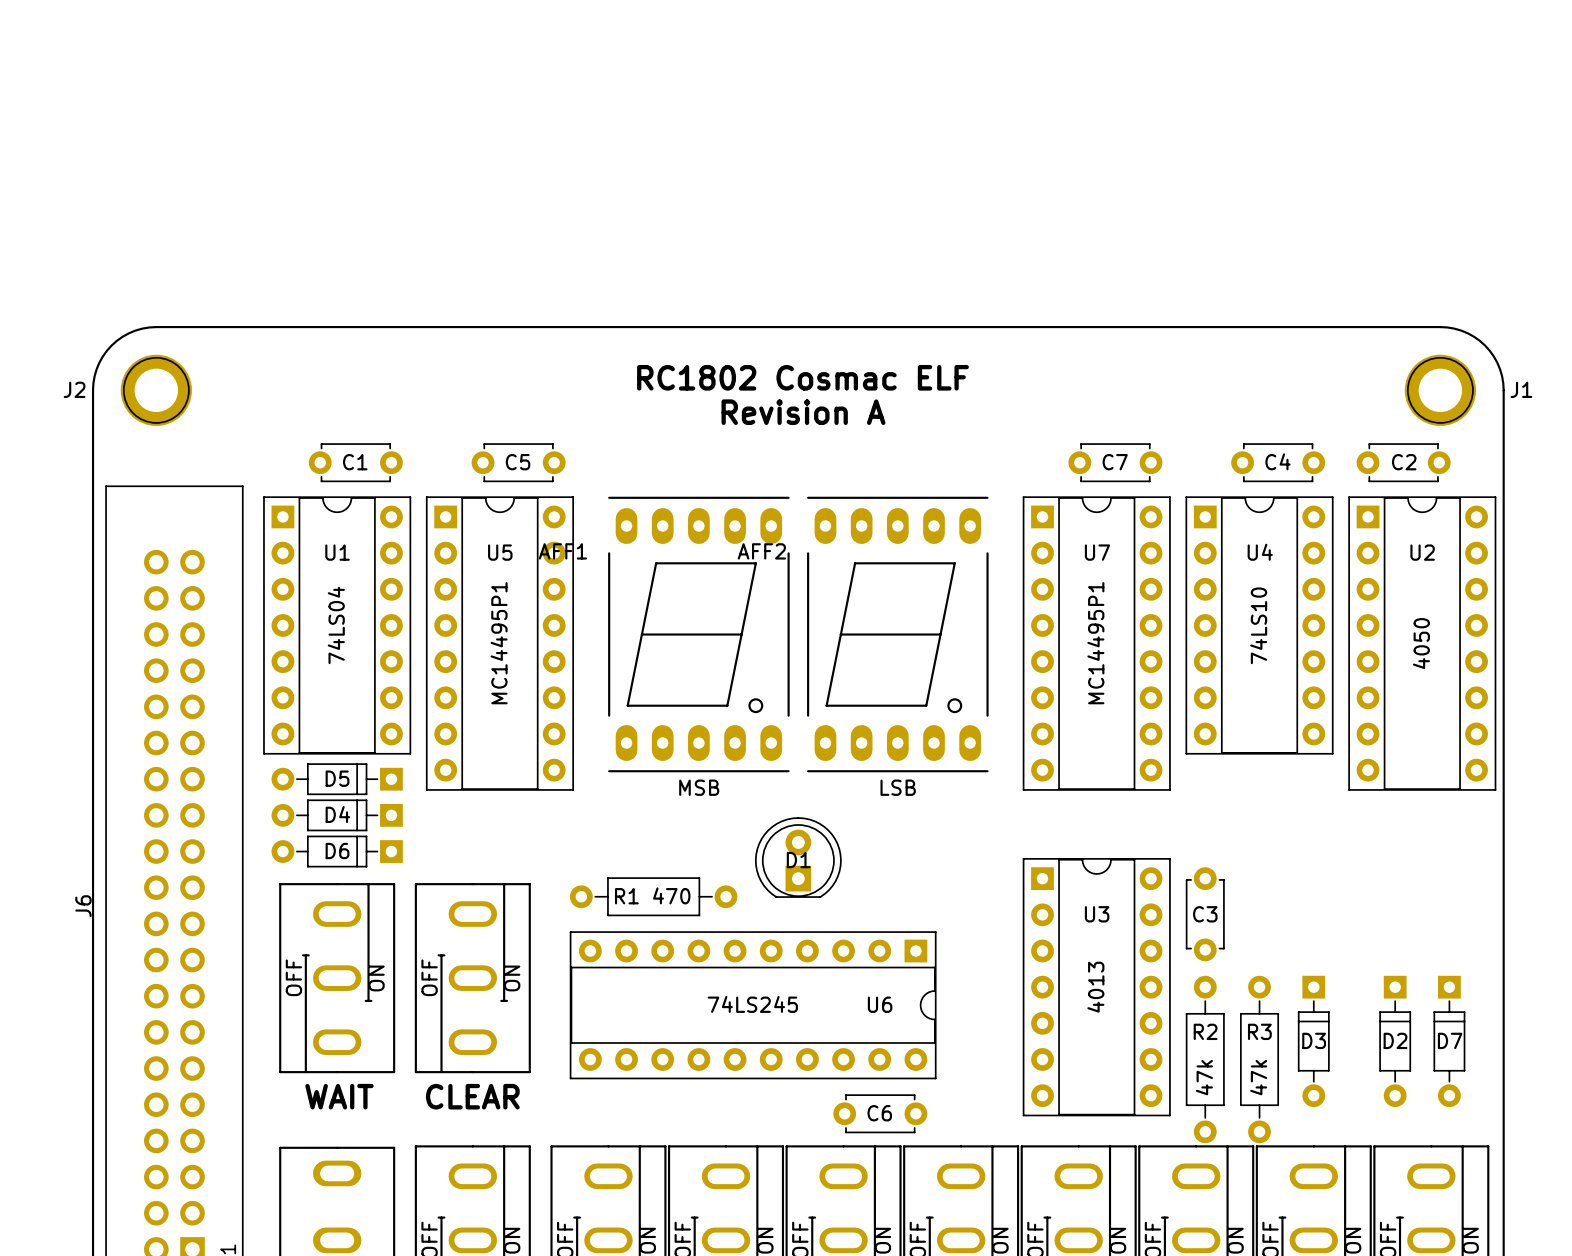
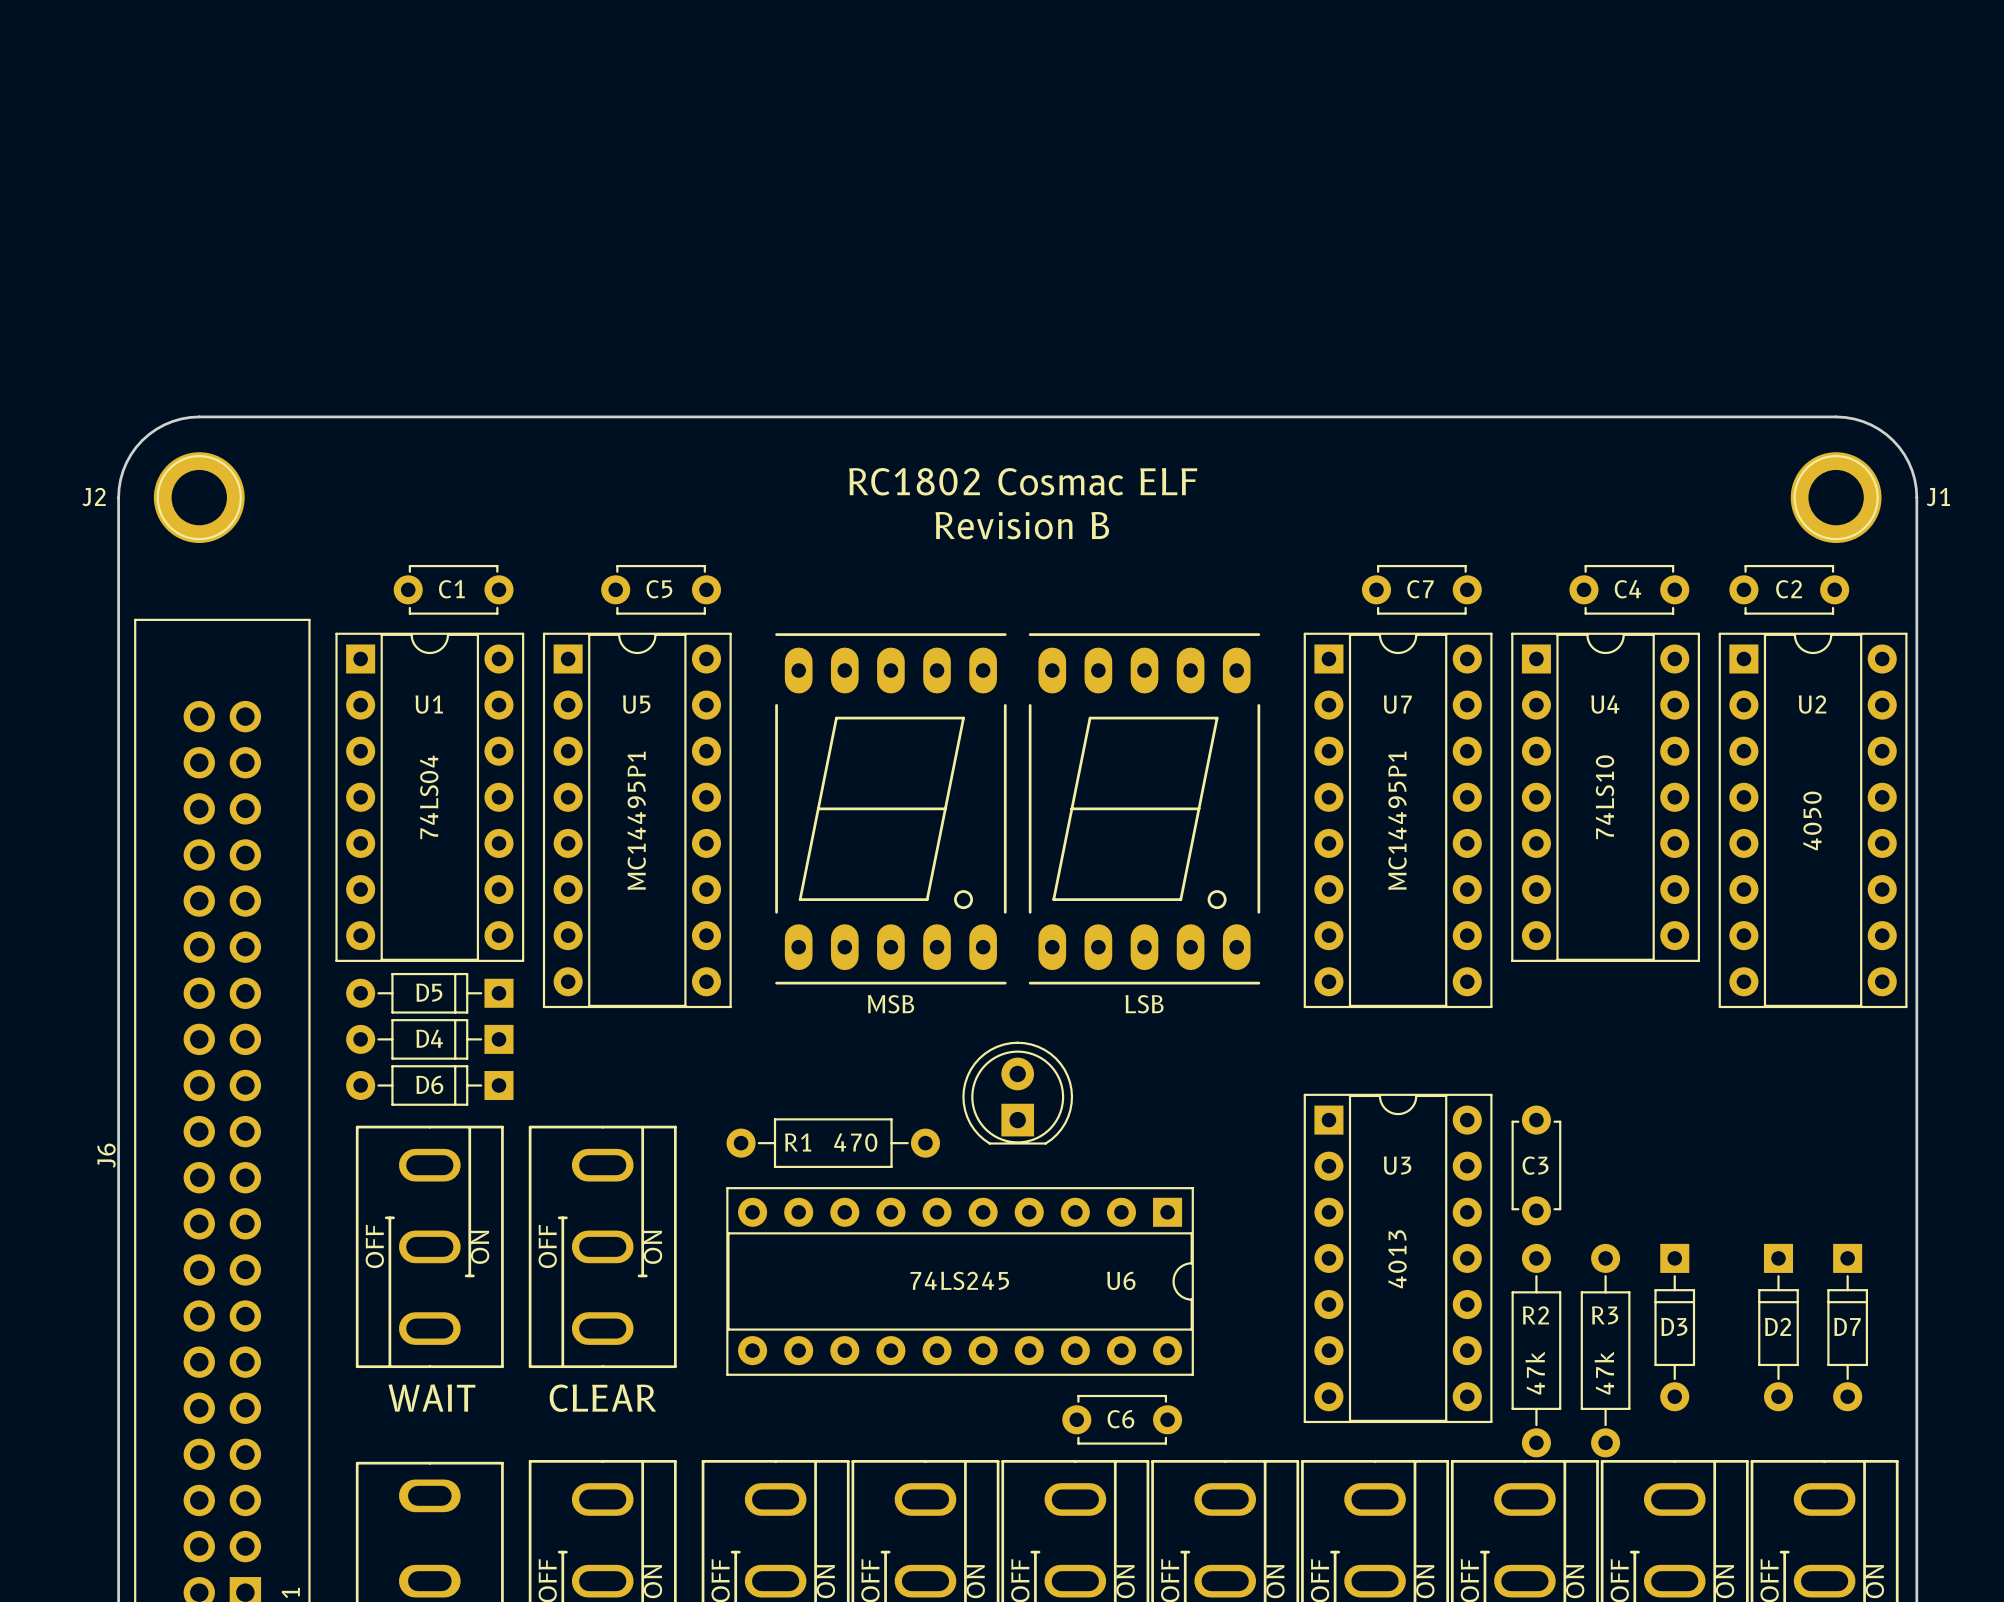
text: Revision A (803, 412) -> Revision B (1022, 525)
AFF1 name: AFF1 (562, 551) -> none
AFF2 name: AFF2 (761, 551) -> none
D1 name: D1 (798, 860) -> none

